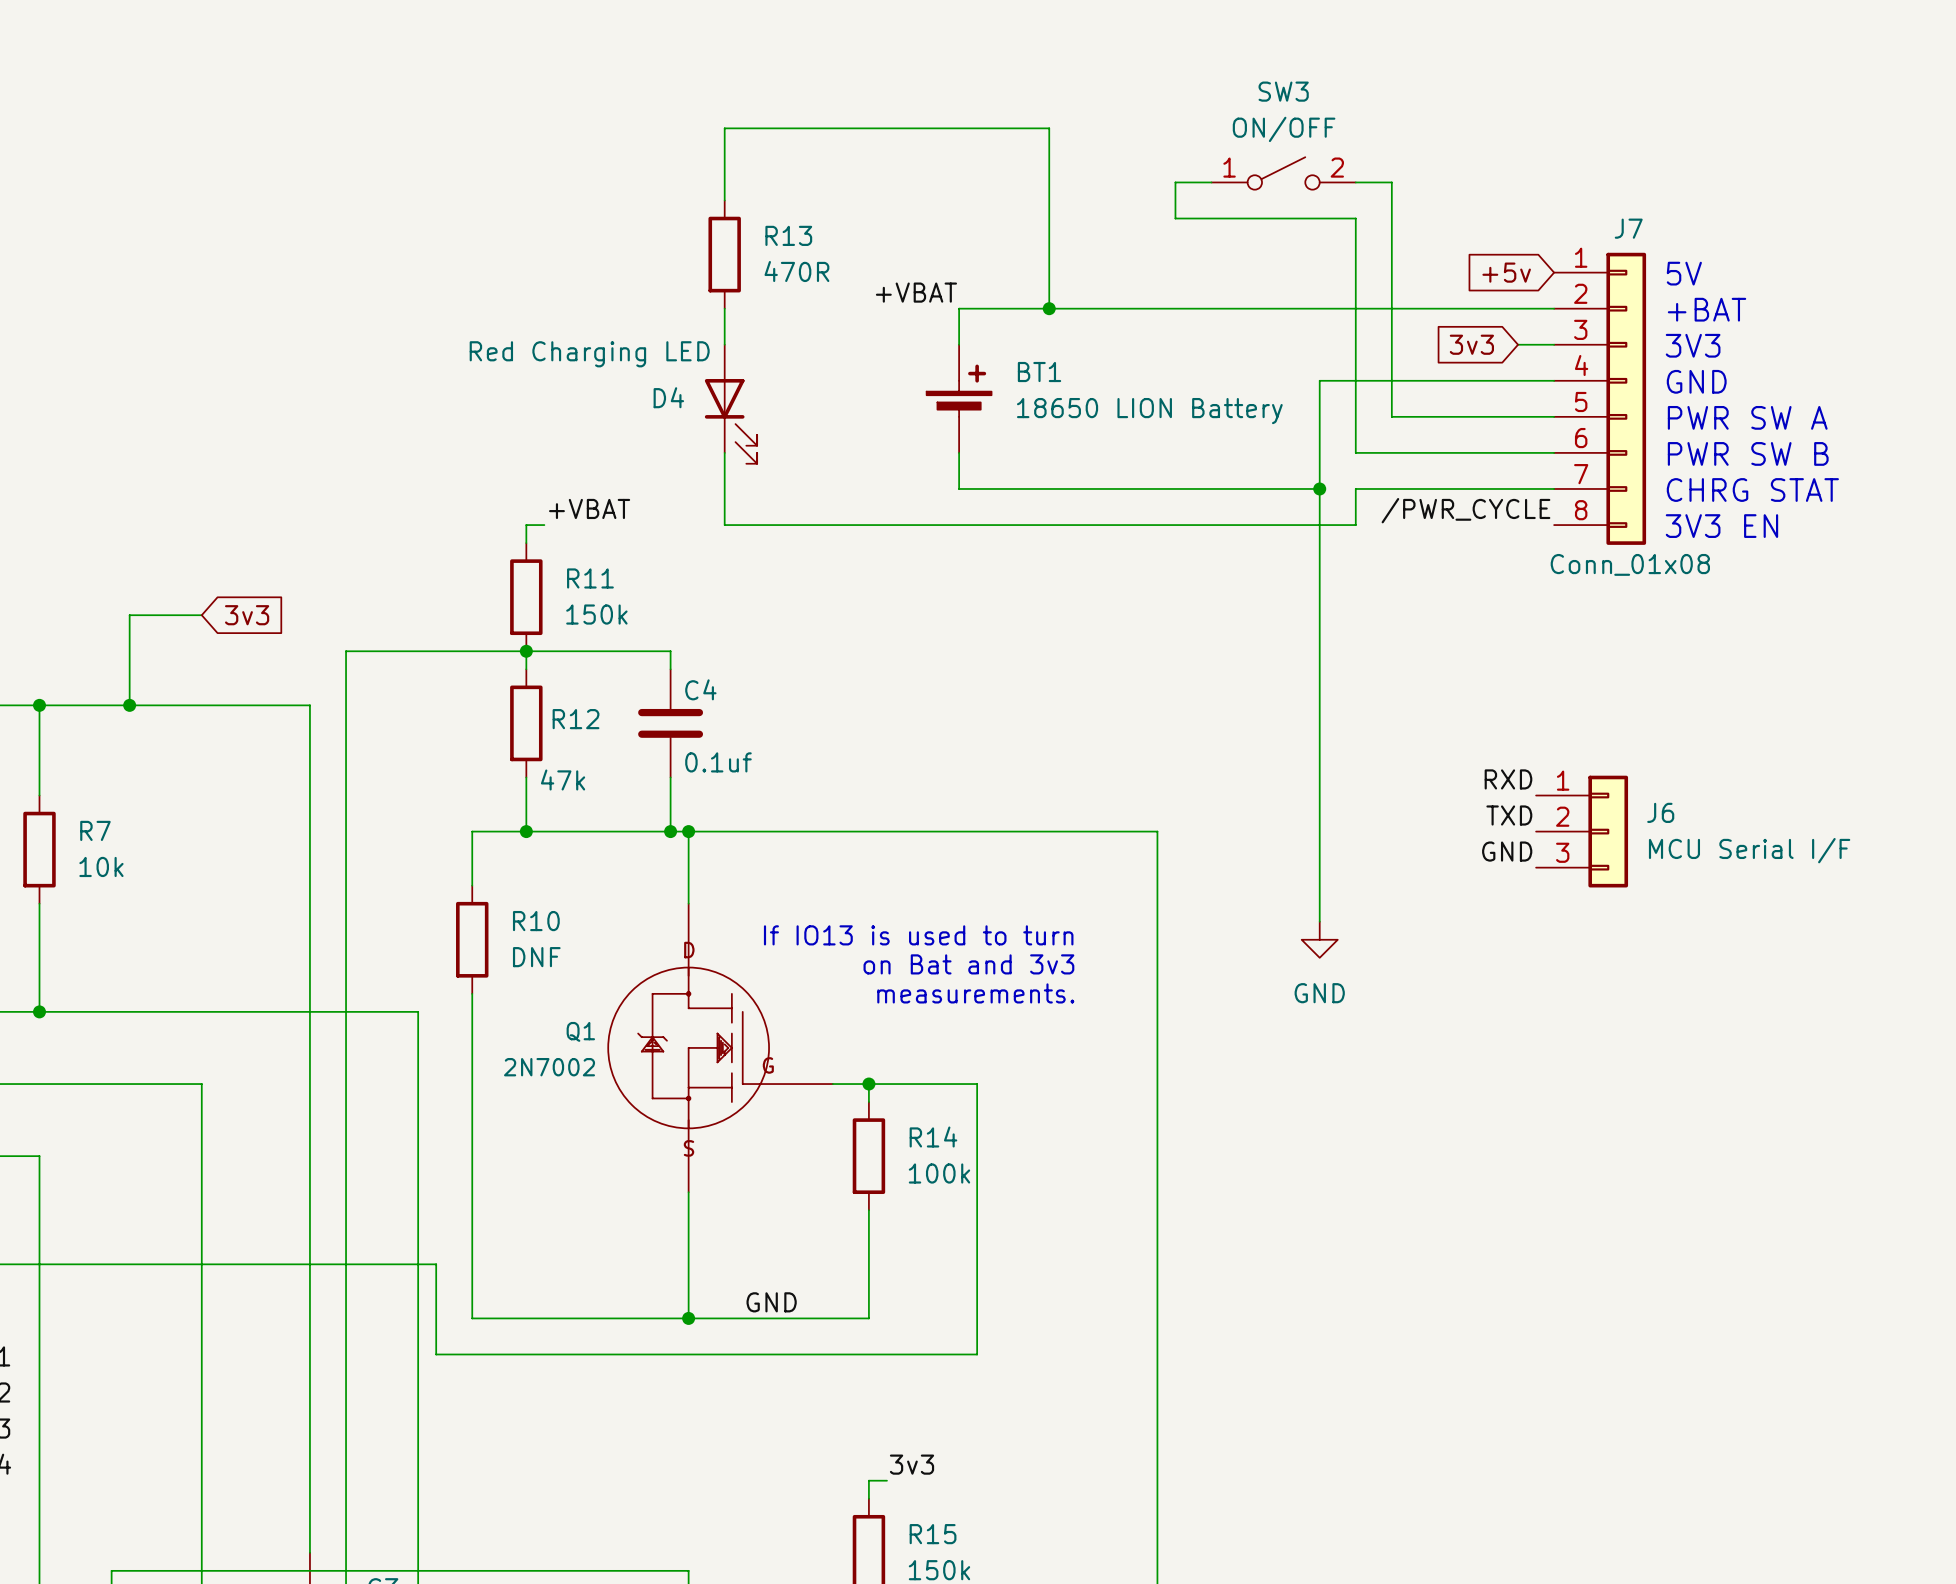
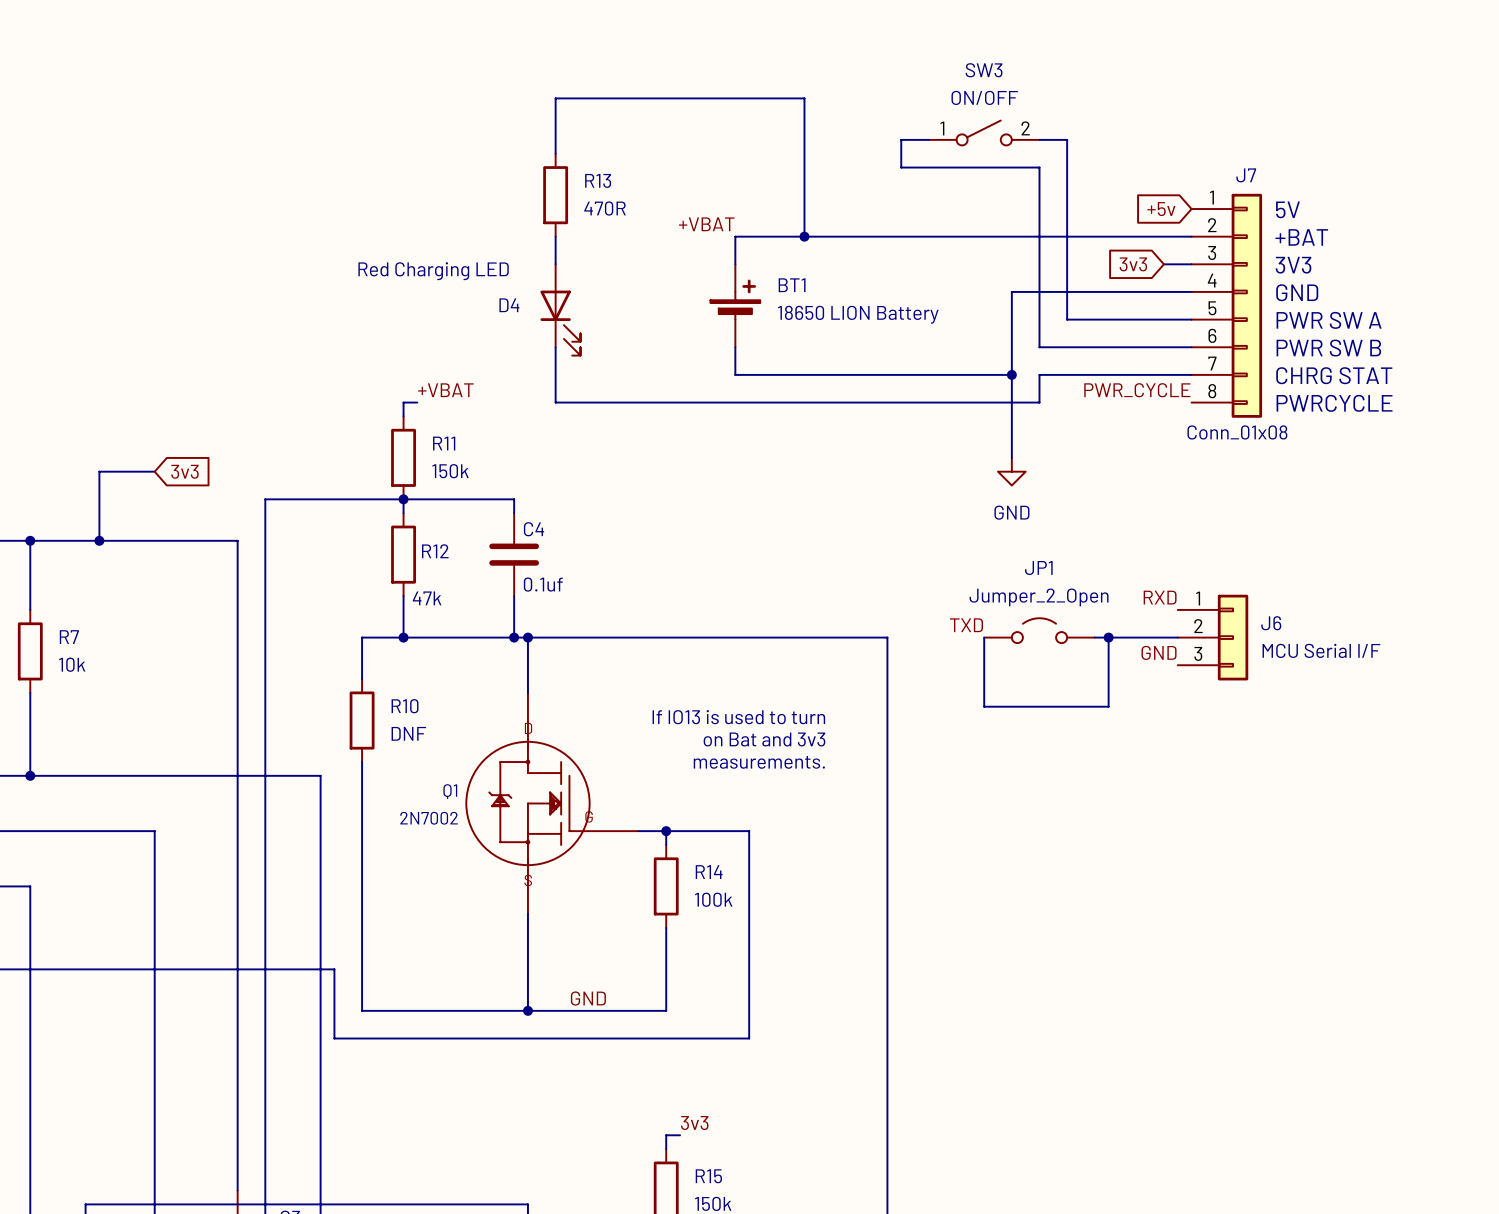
label: /PWR_CYCLE (1465, 510) -> PWR_CYCLE (1137, 390)
text: 3V3 EN (1721, 526) -> PWRCYCLE (1334, 403)
wire: (1319, 597) (1319, 921) -> none
label position: TXD (1509, 815) -> TXD (966, 625)
JP1: none -> Jumper_2_Open (1039, 630)
wire: none -> (984, 637) (984, 706) (1108, 706) (1108, 637)
wire: none -> (1094, 637) (1177, 637)
junction: none -> (1108, 637)
power symbol position: GND (1319, 939) -> GND (1011, 471)

